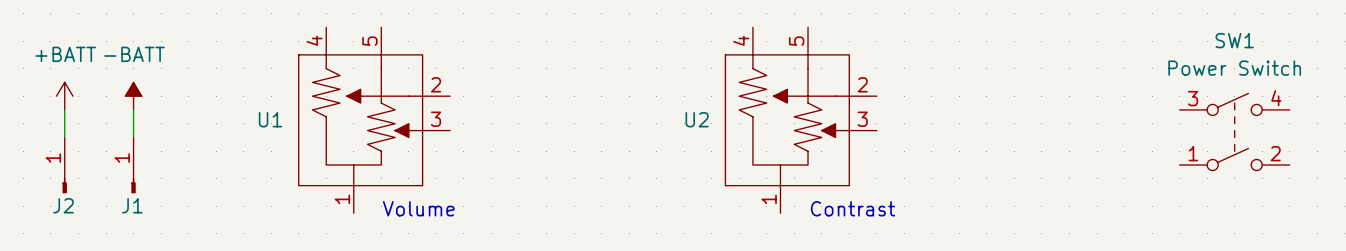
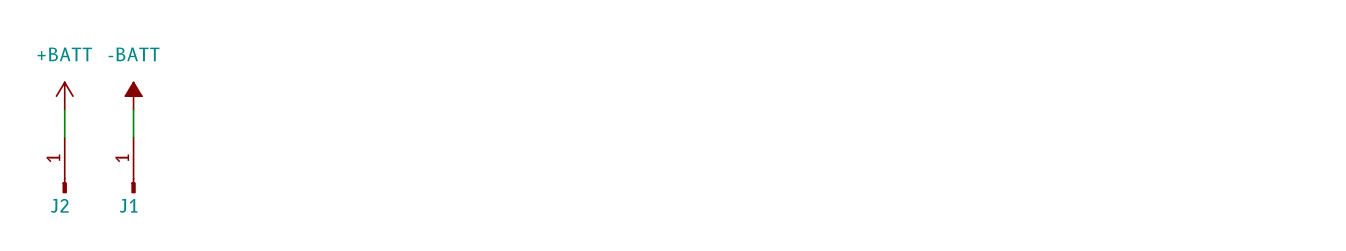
U1: (374, 120) -> none
U2: (801, 120) -> none
SW1: Power Switch (1234, 131) -> none
text: Volume (418, 208) -> none
text: Contrast (853, 208) -> none

